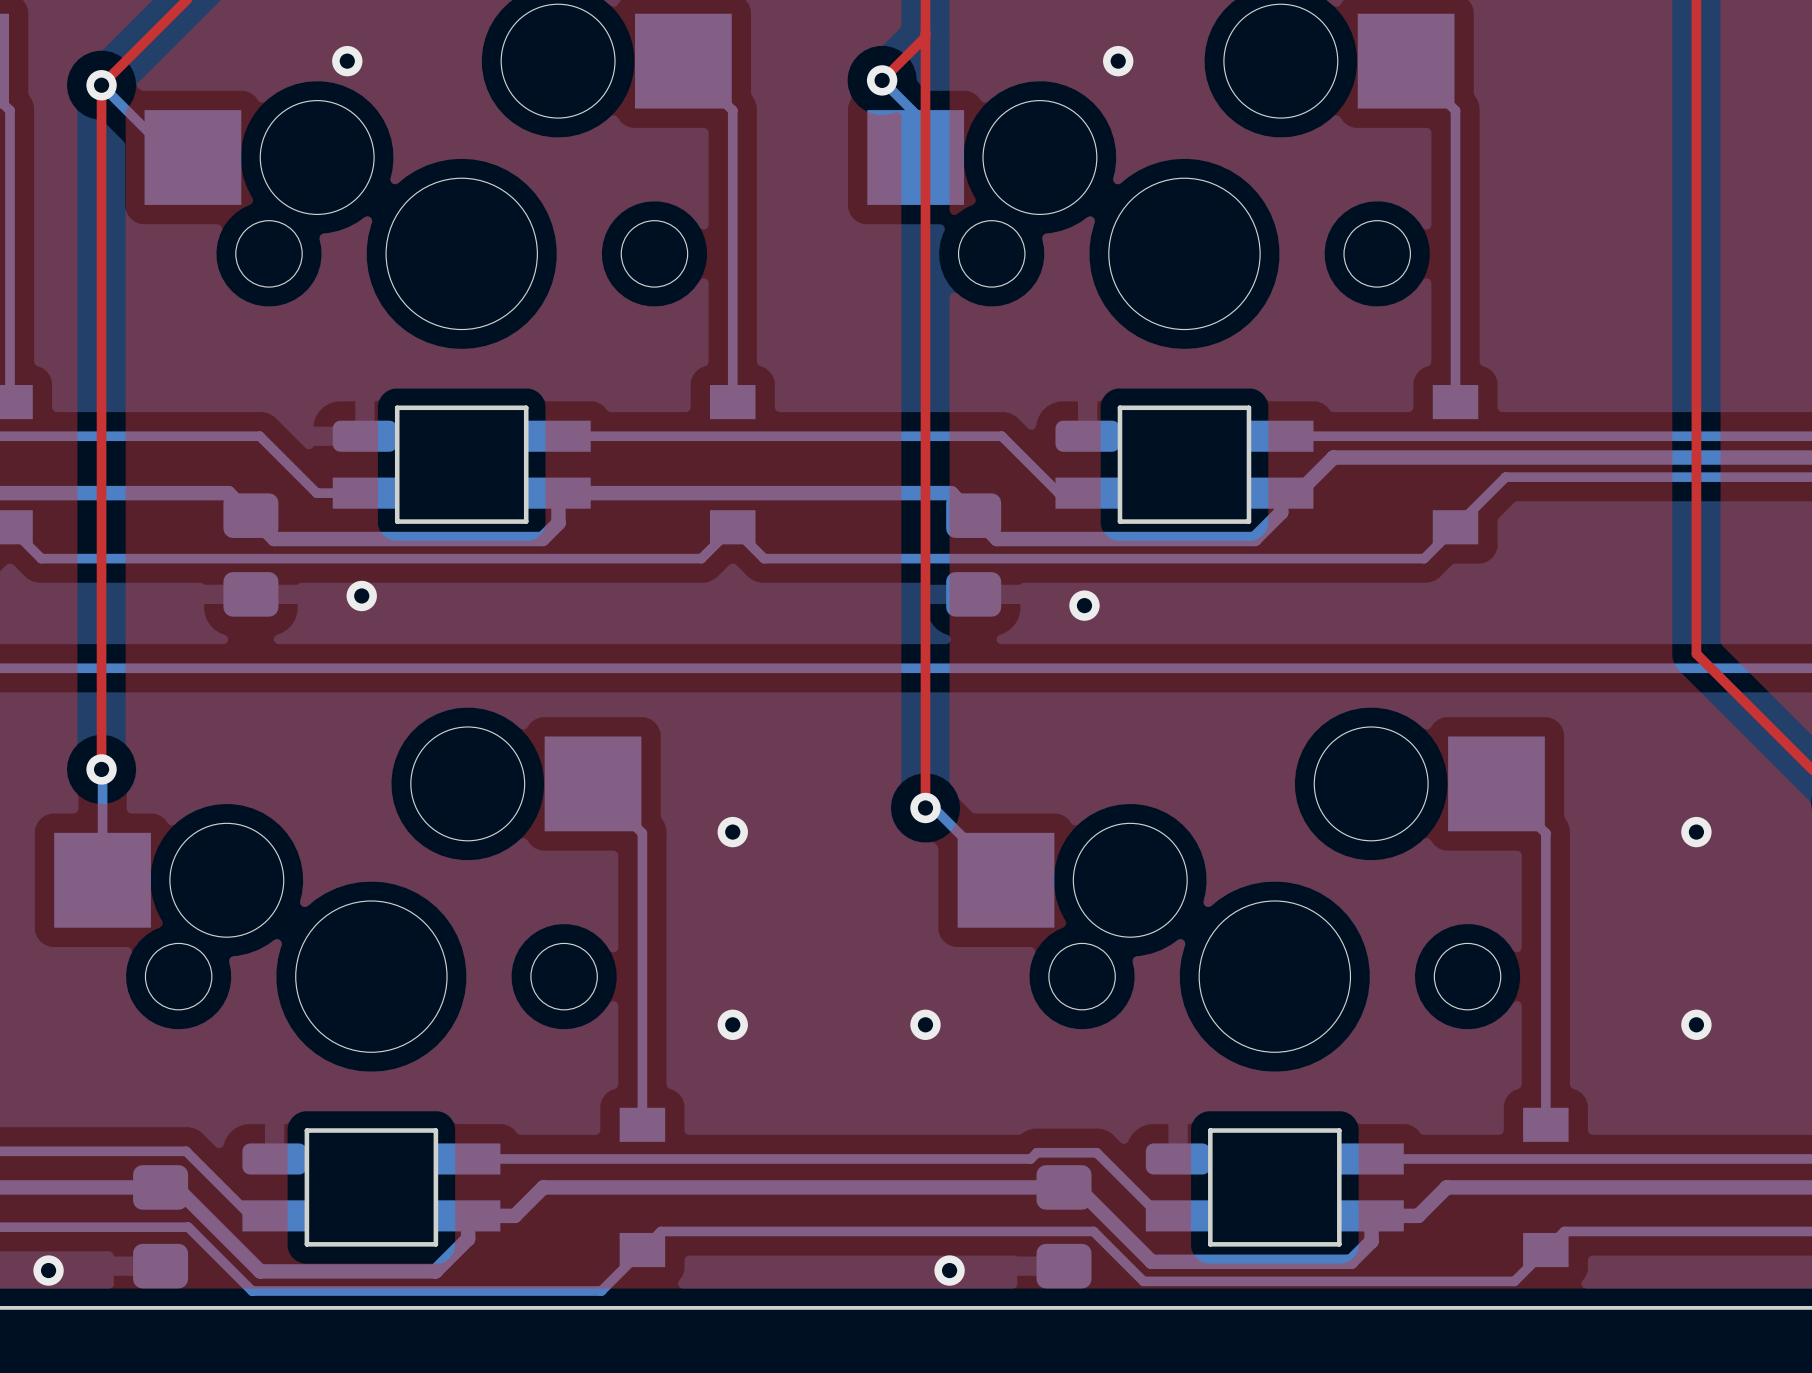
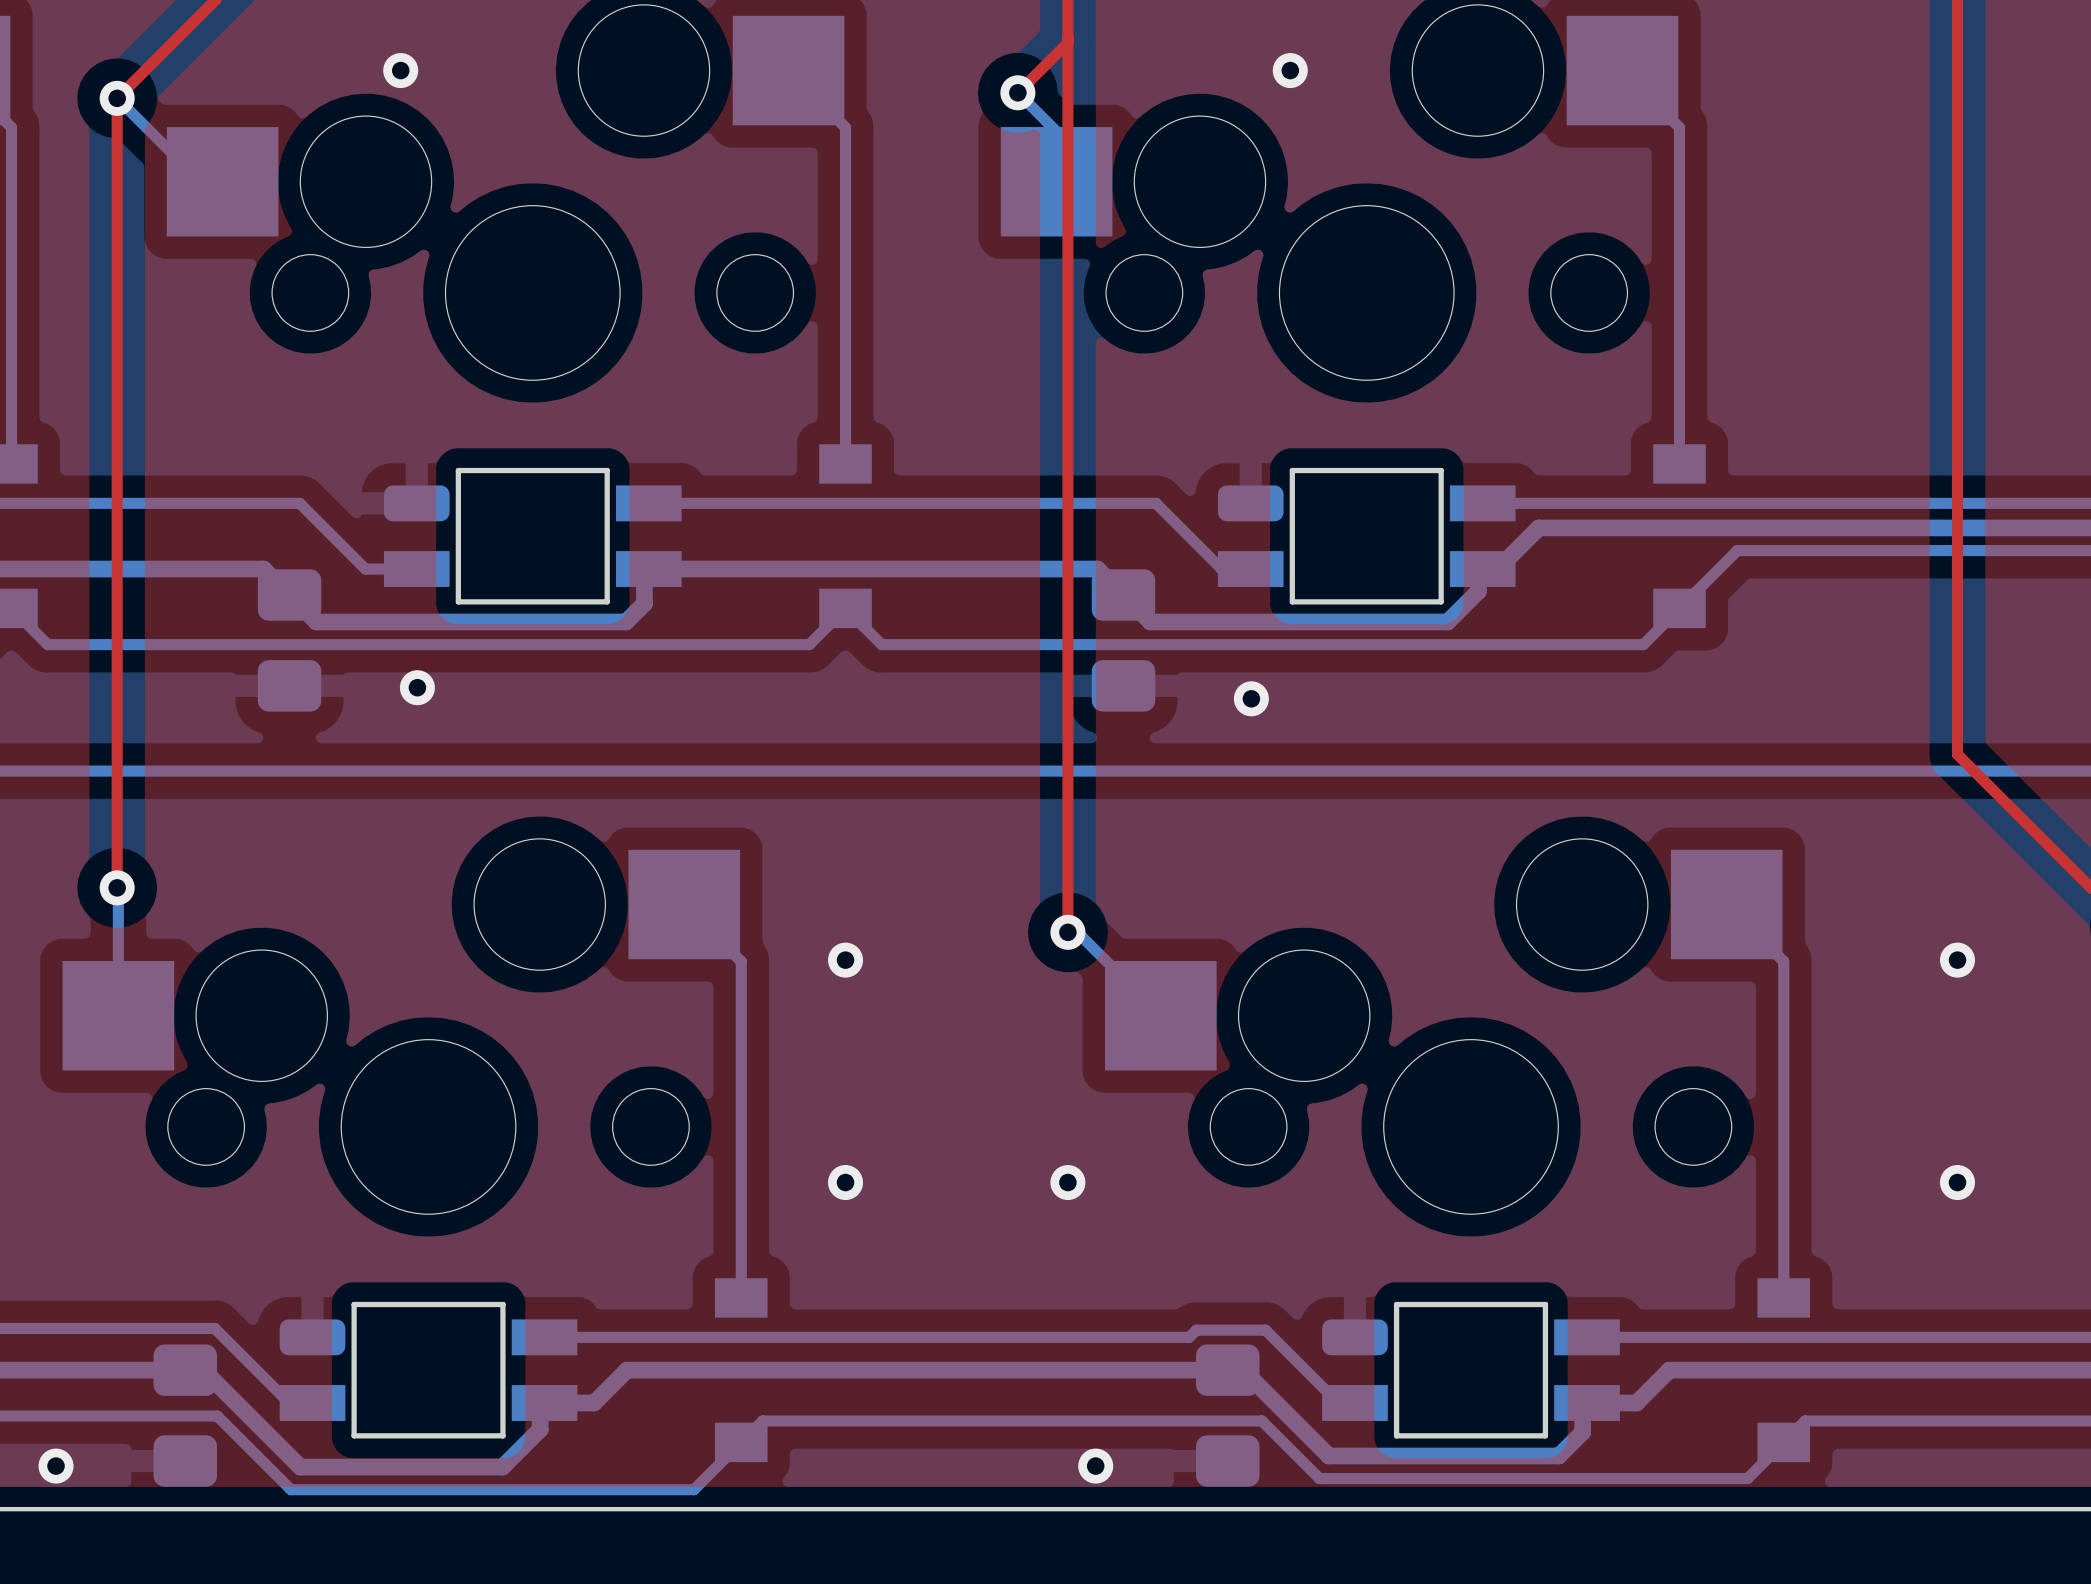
part footprint: [332, 405, 591, 524] -> [383, 467, 682, 605]
part footprint: [1055, 405, 1314, 524] -> [1217, 467, 1516, 605]
part footprint: [242, 1128, 501, 1247] -> [279, 1301, 578, 1439]
part footprint: [1145, 1128, 1404, 1247] -> [1322, 1301, 1620, 1439]

